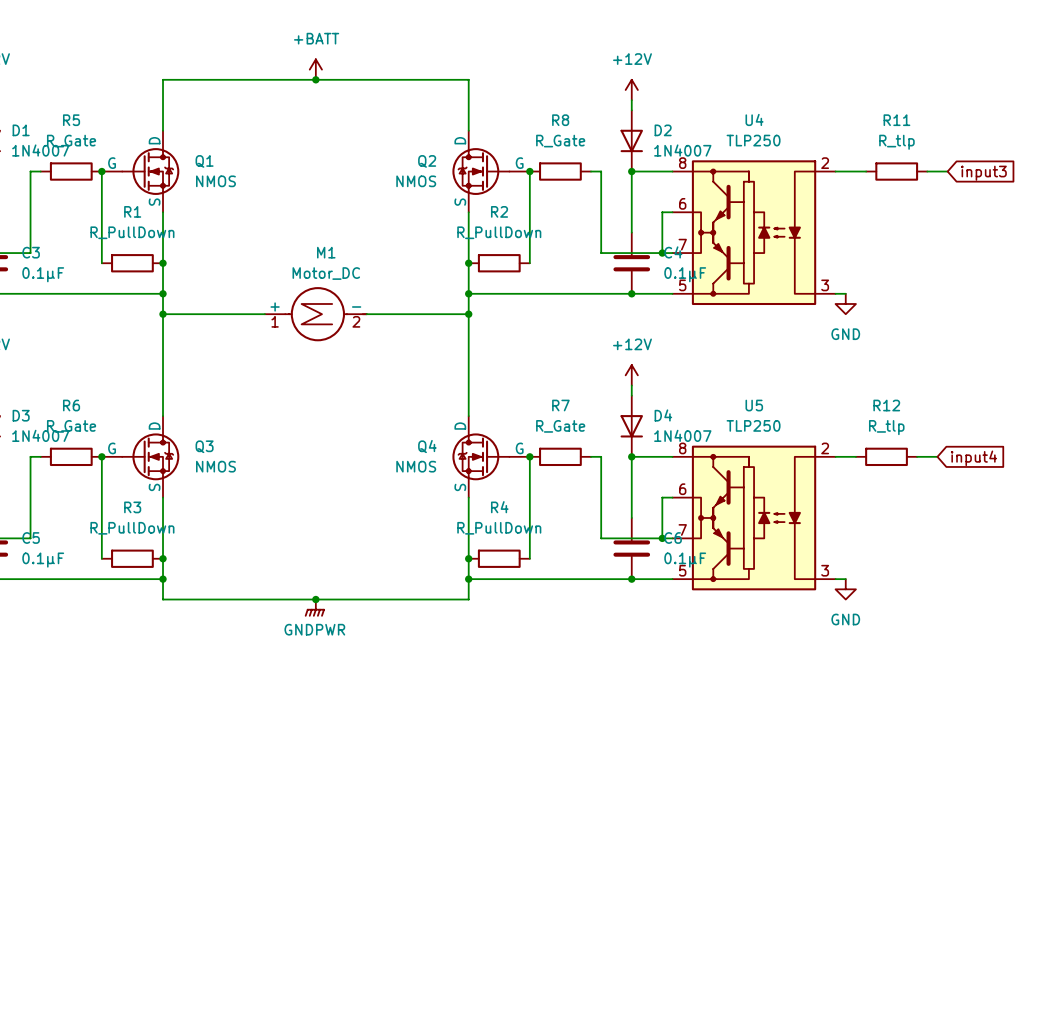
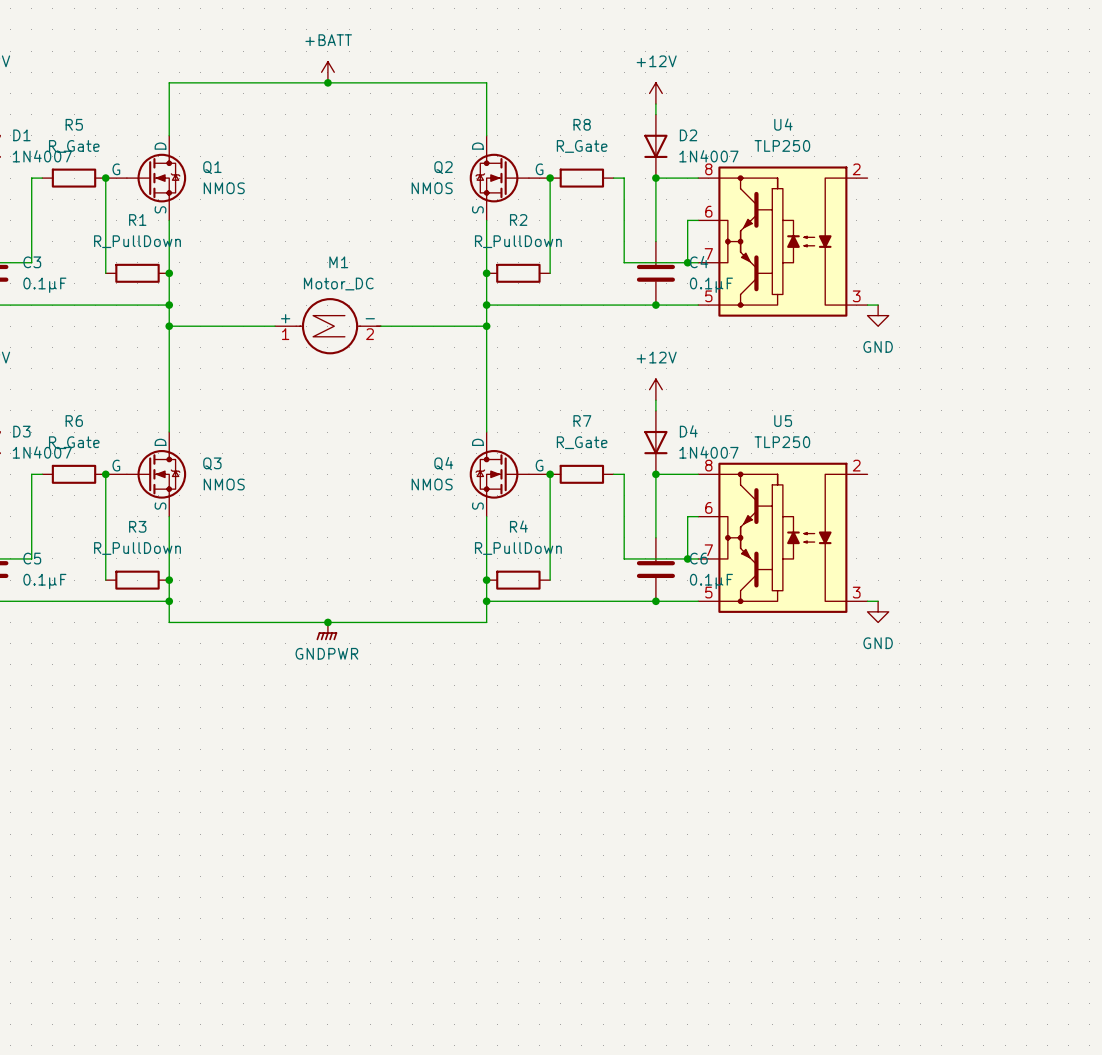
wire: (835, 171) (866, 171) -> none
R11: R_tlp (896, 171) -> none
wire: (927, 171) (947, 171) -> none
global label: input3 (983, 173) -> none
wire: (835, 456) (855, 456) -> none
R12: R_tlp (886, 456) -> none
wire: (917, 456) (937, 456) -> none
global label: input4 (974, 458) -> none

